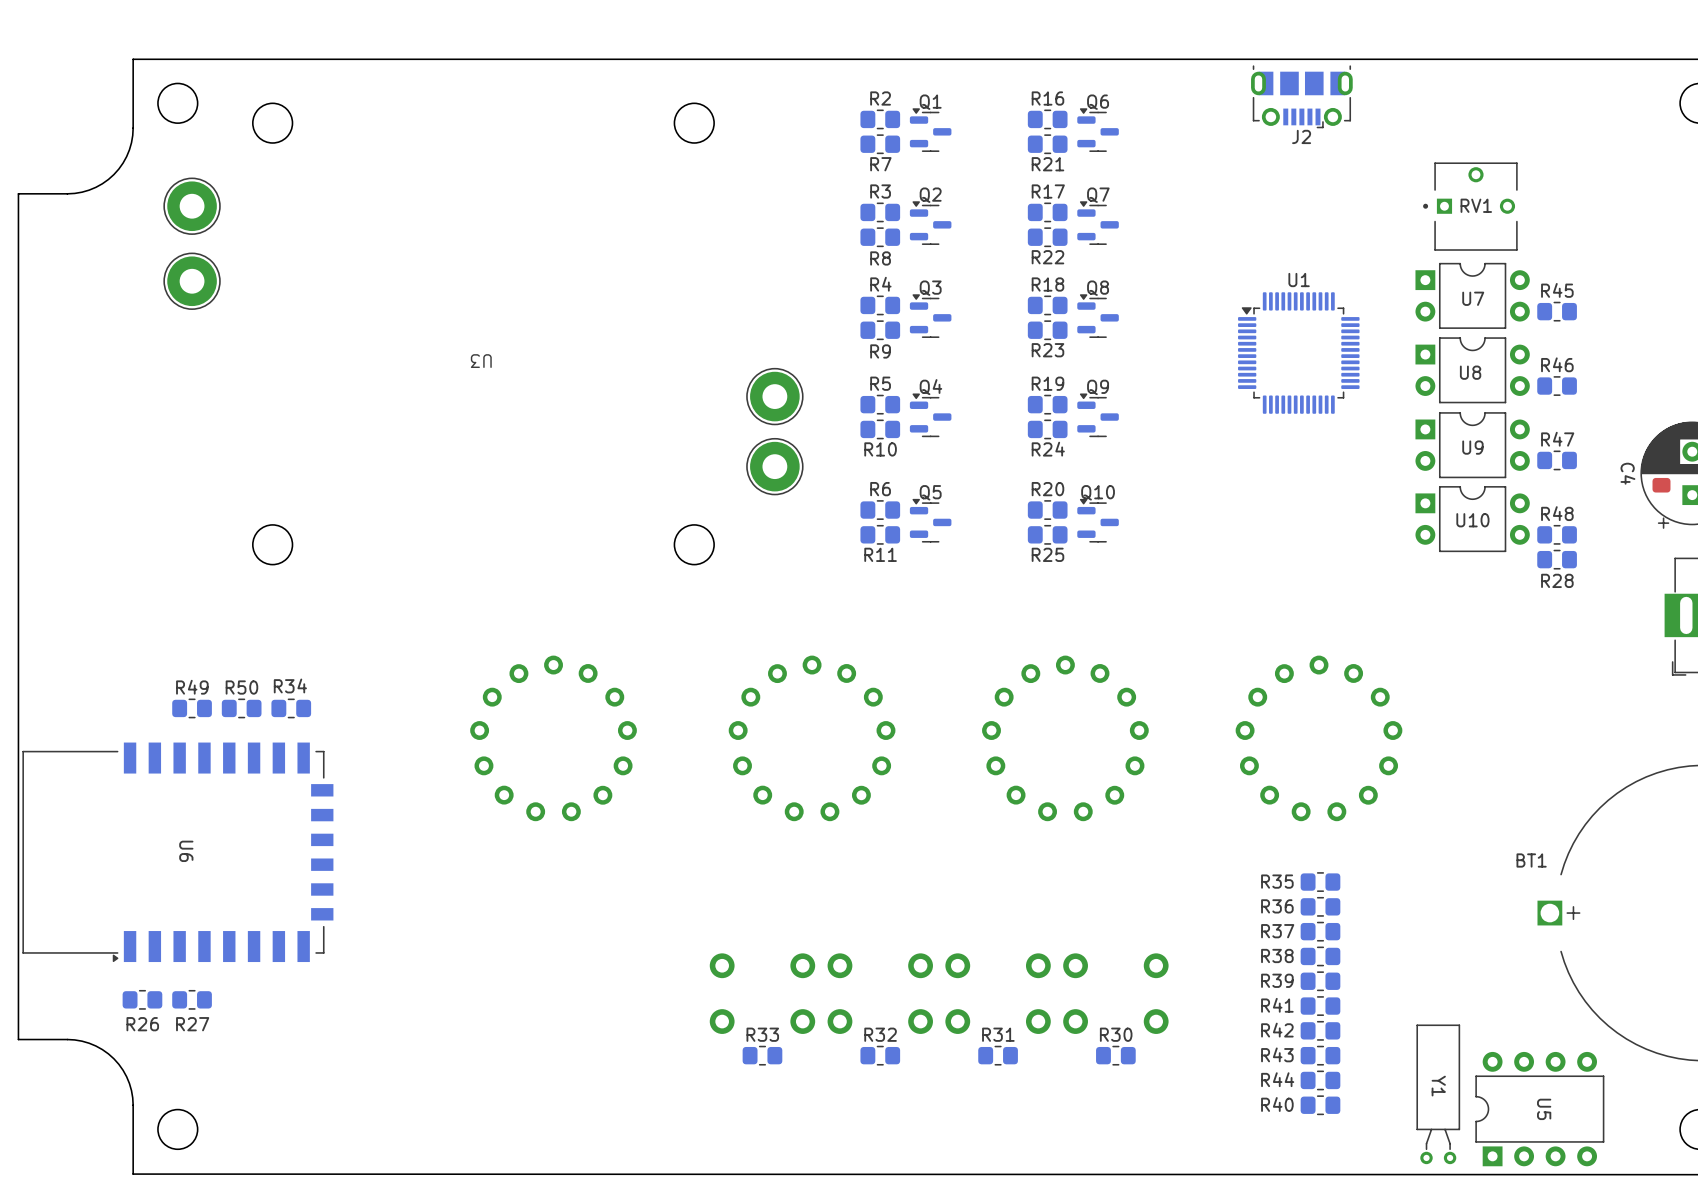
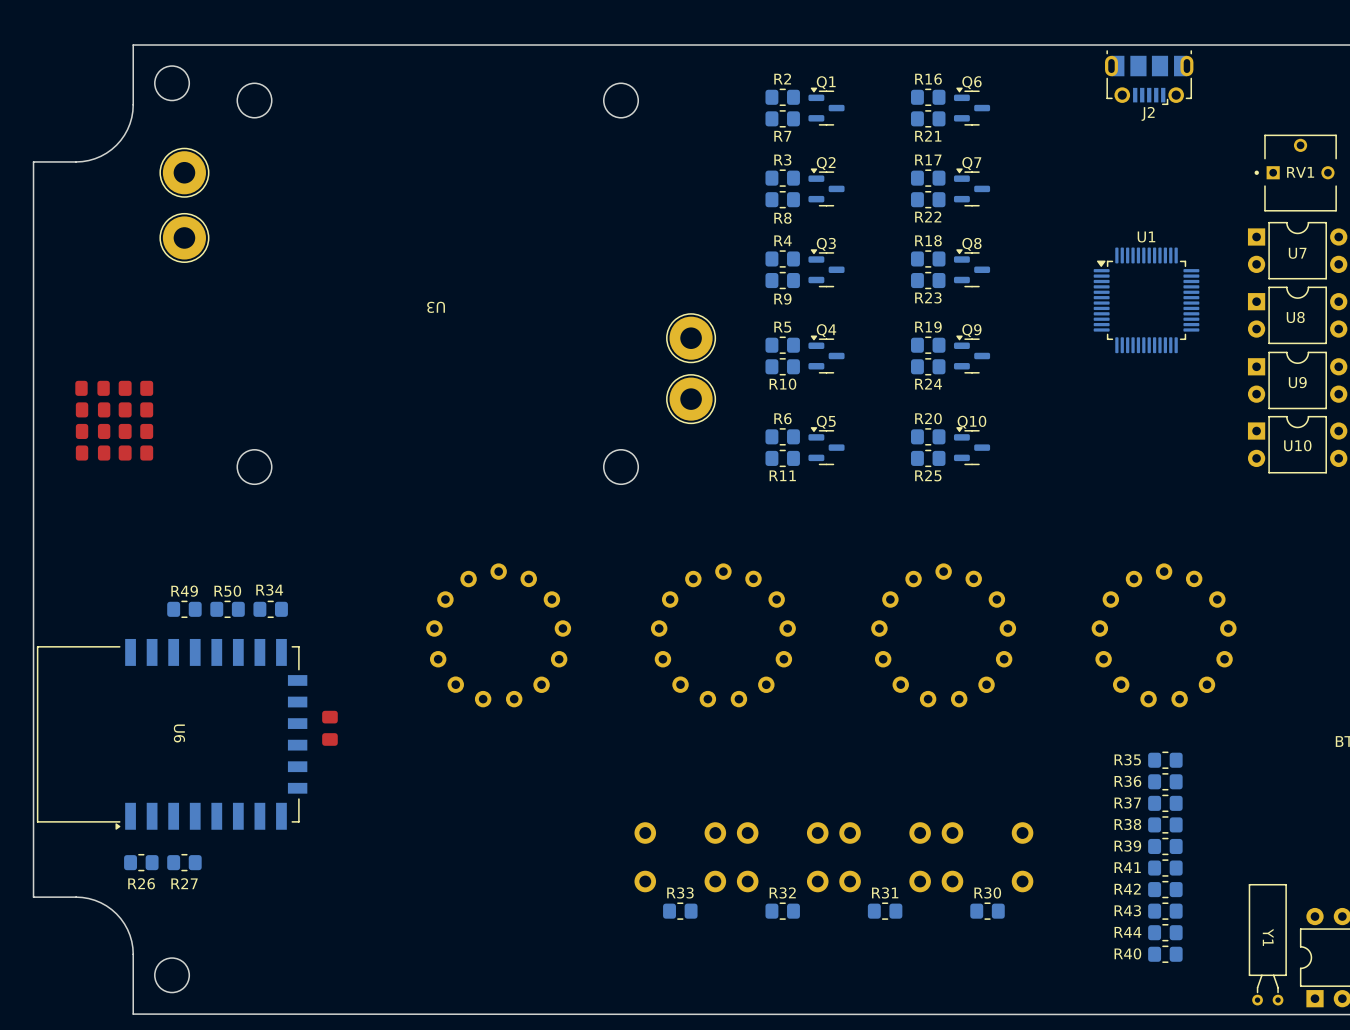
part: none -> (92, 388)
part: none -> (135, 388)
part: none -> (93, 409)
part: none -> (135, 409)
part: none -> (93, 431)
part: none -> (135, 431)
part: none -> (93, 453)
part: none -> (135, 453)
part: none -> (329, 728)

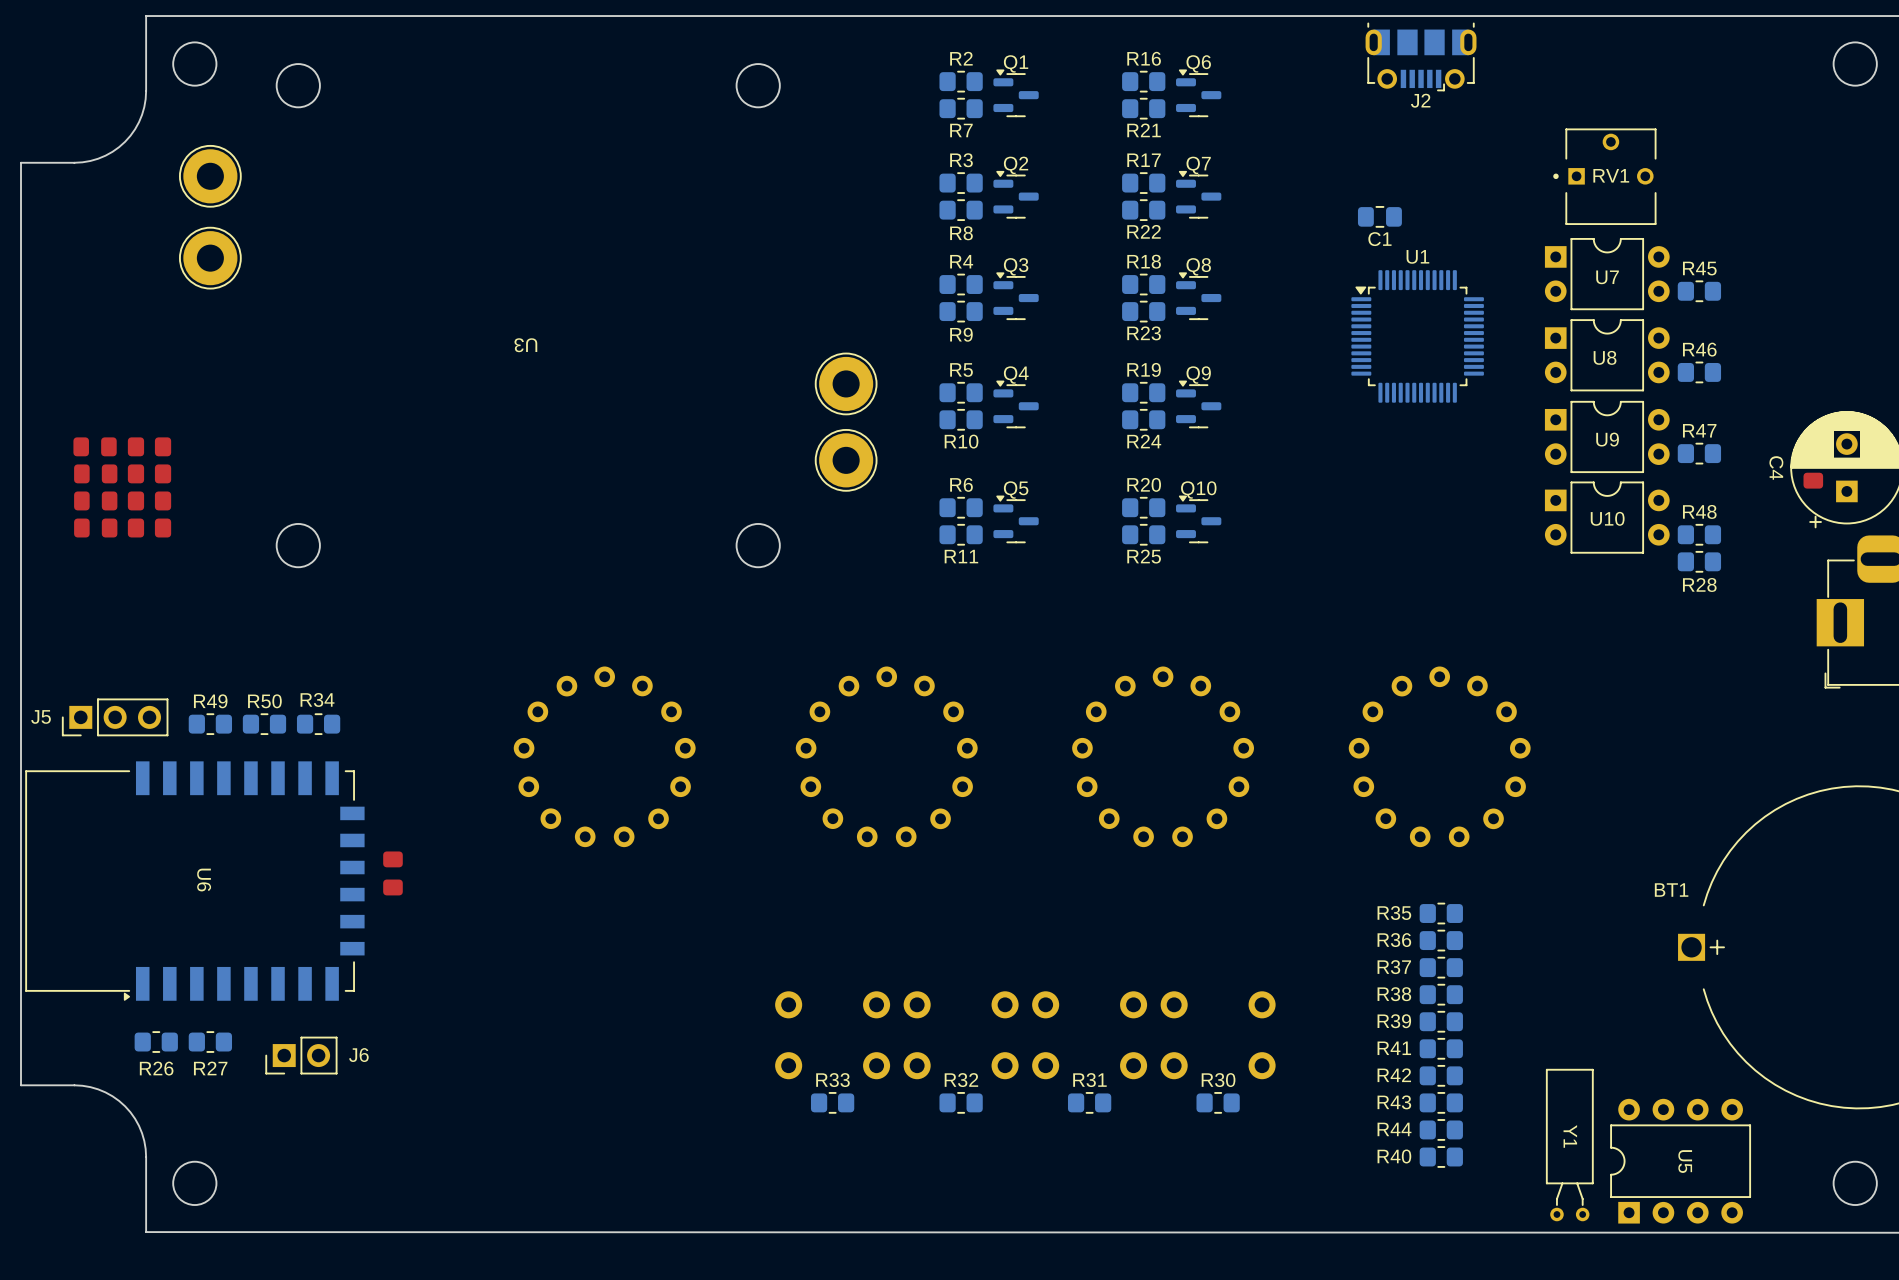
C1: none -> (1379, 216)
J5: none -> (115, 717)
J6: none -> (301, 1055)

